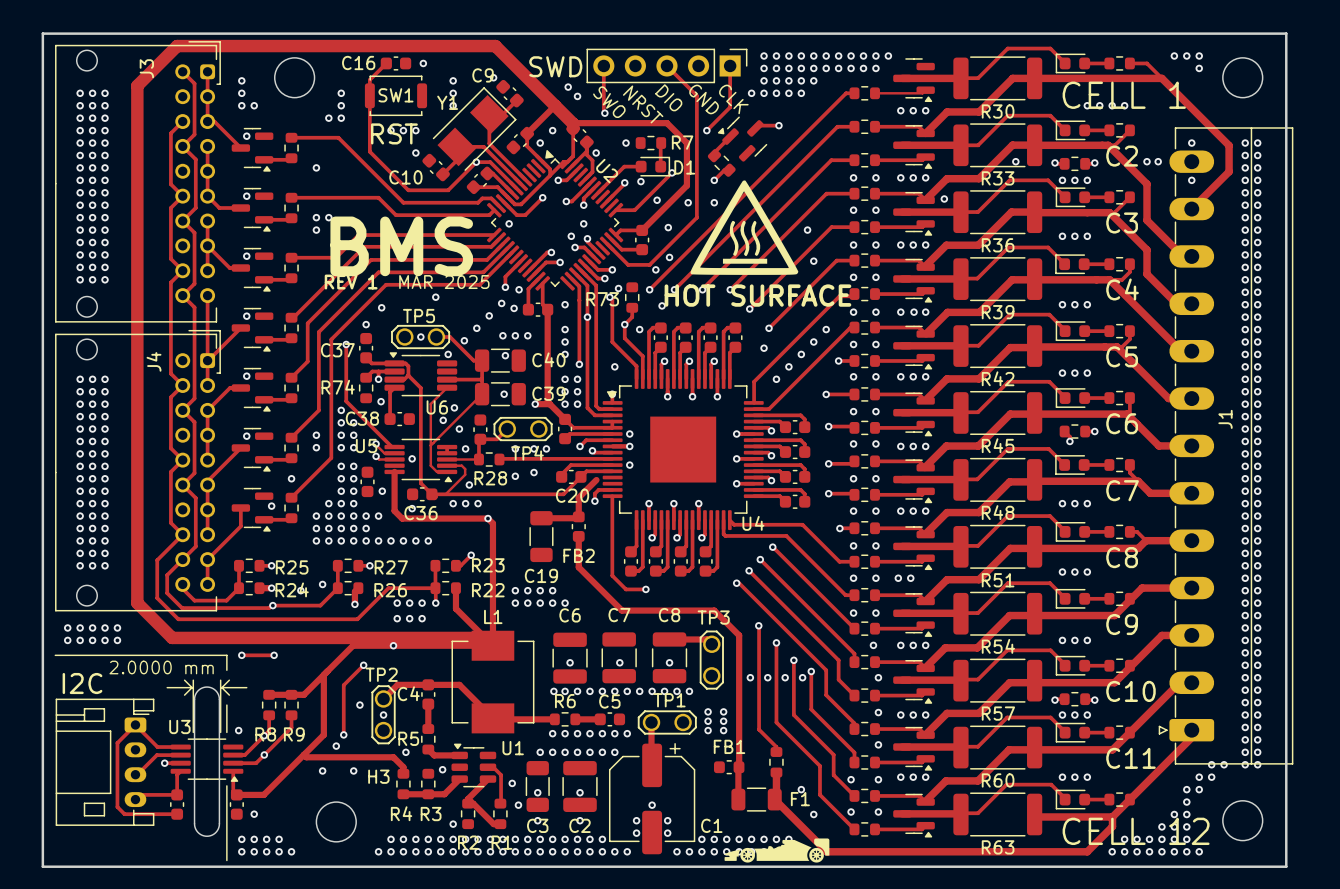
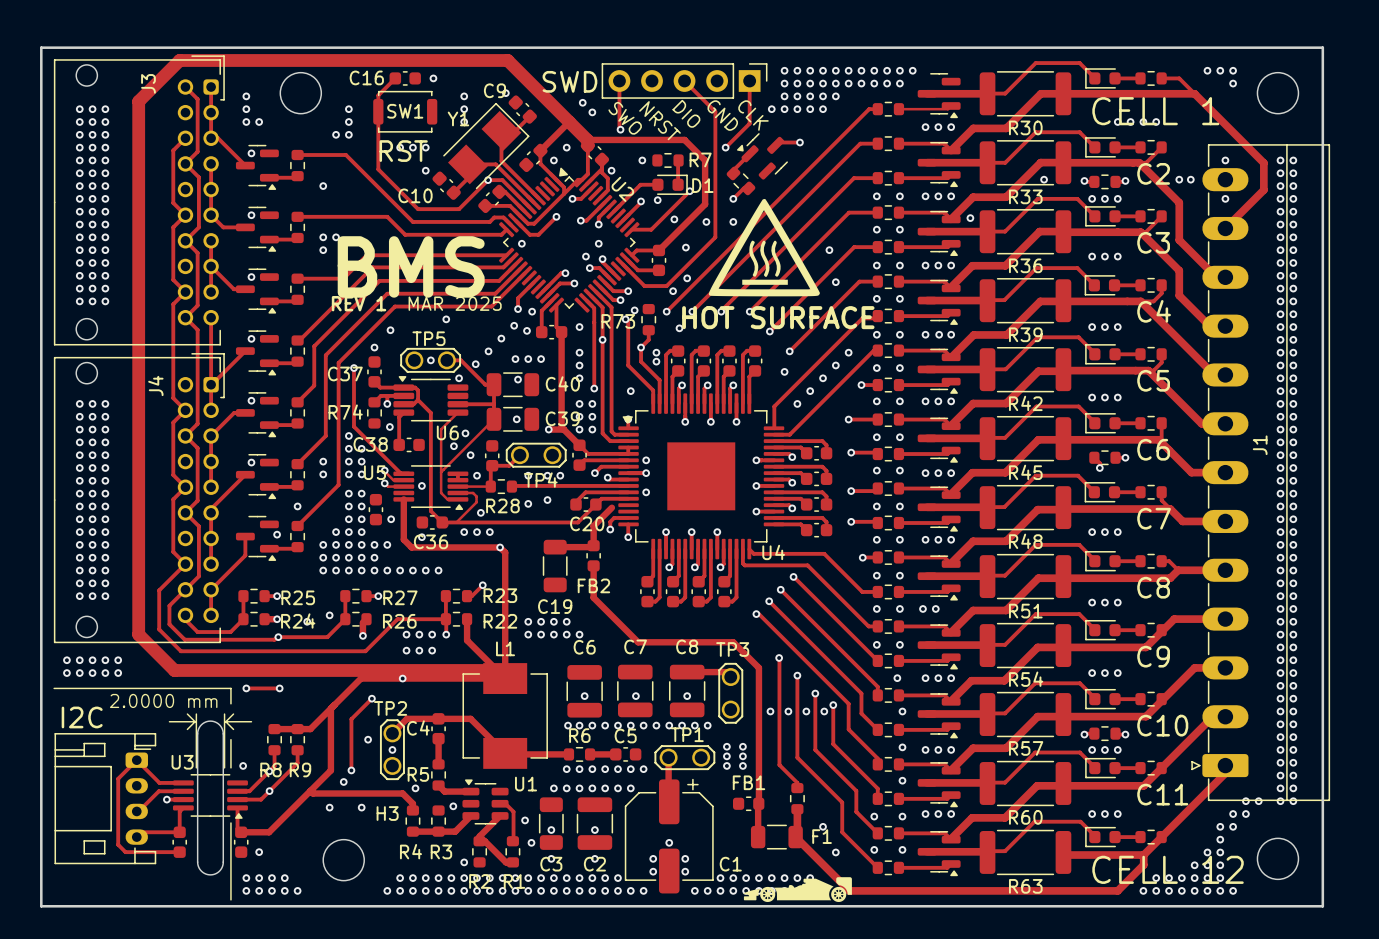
via: none -> (656, 361)
track: (612, 508) (612, 575) (626, 589) (645, 589) -> none
via: none -> (628, 537)
via: (645, 589) -> none

